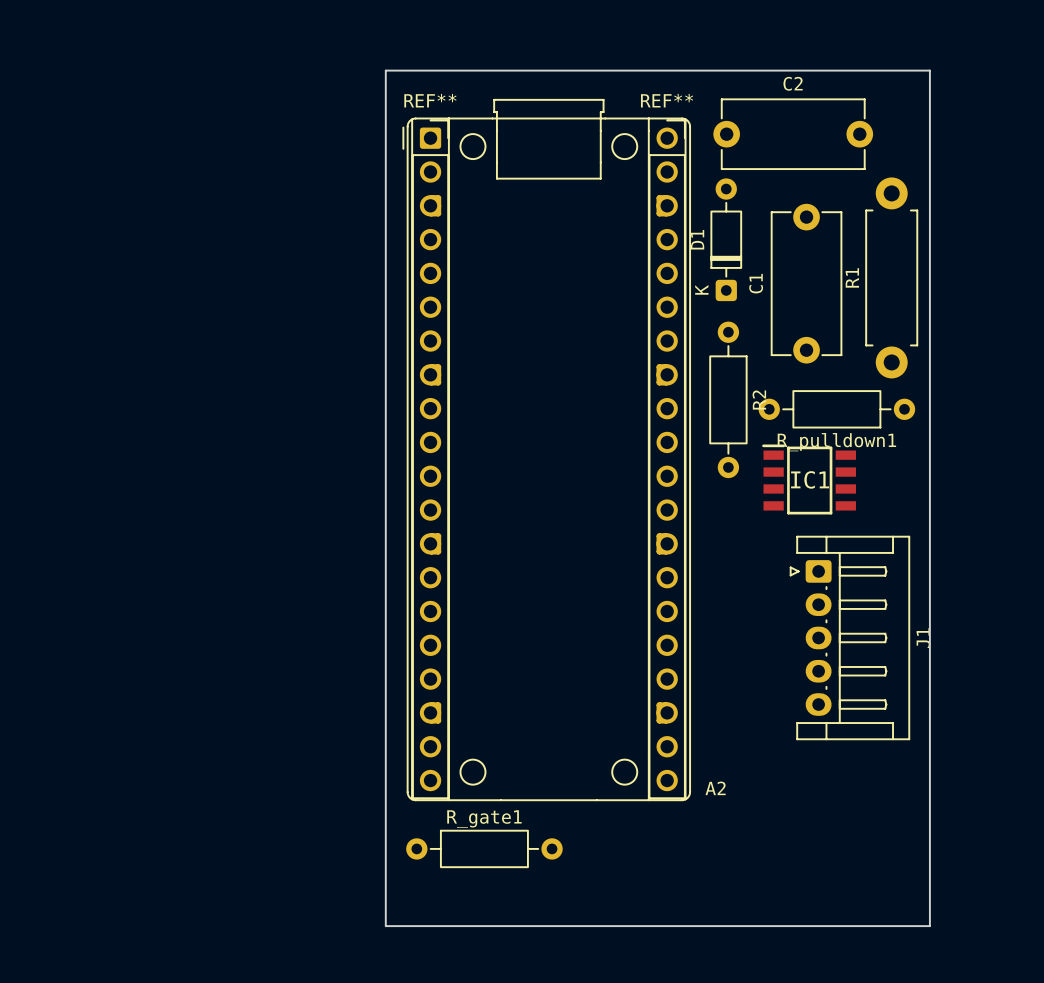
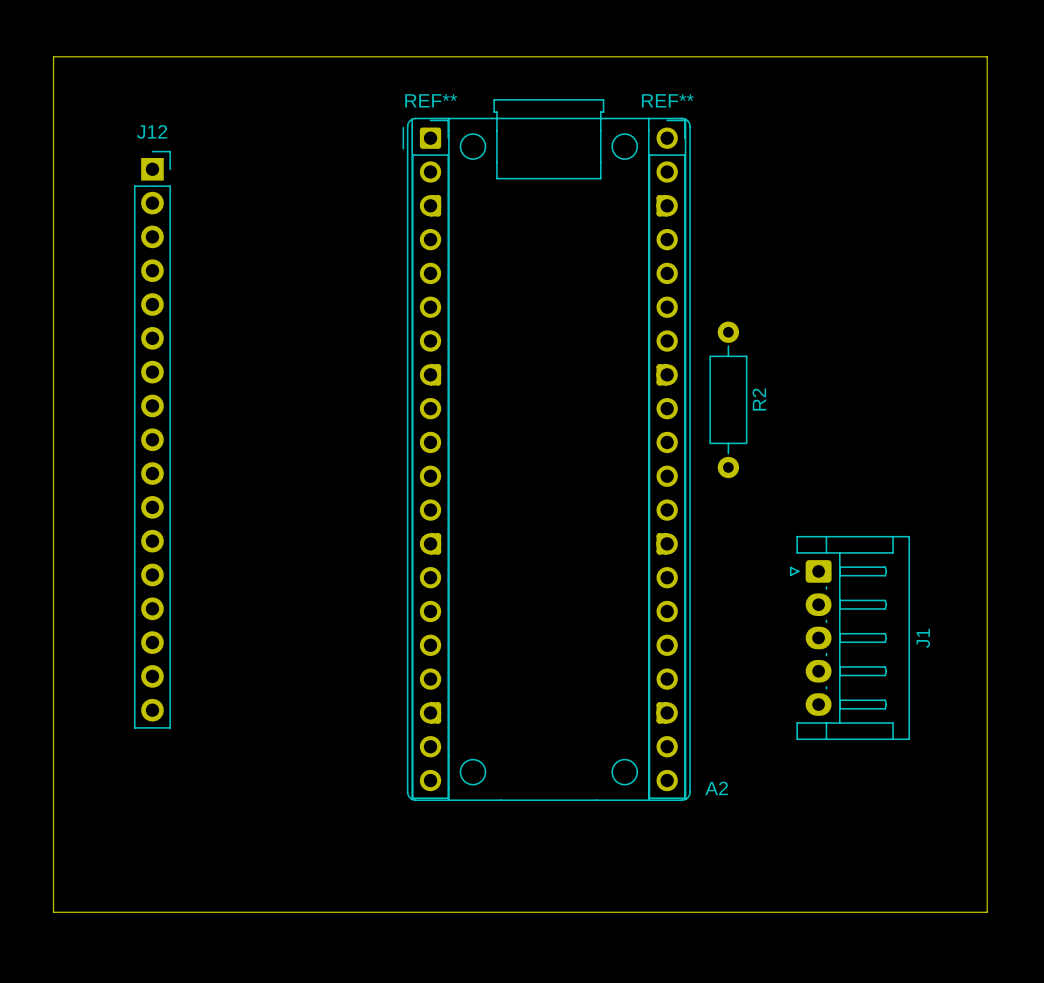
board edge: (385, 70) (929, 70) (929, 926) (385, 926) (385, 70) -> (53, 56) (53, 912) (987, 912) (987, 56) (53, 56)
C2: (793, 134) -> none
D1: (726, 239) -> none
R1: (891, 277) -> none
C1: (806, 283) -> none
R_pulldown1: (836, 409) -> none
J12: none -> (152, 439)
IC1: (809, 479) -> none
R_gate1: (484, 848) -> none

